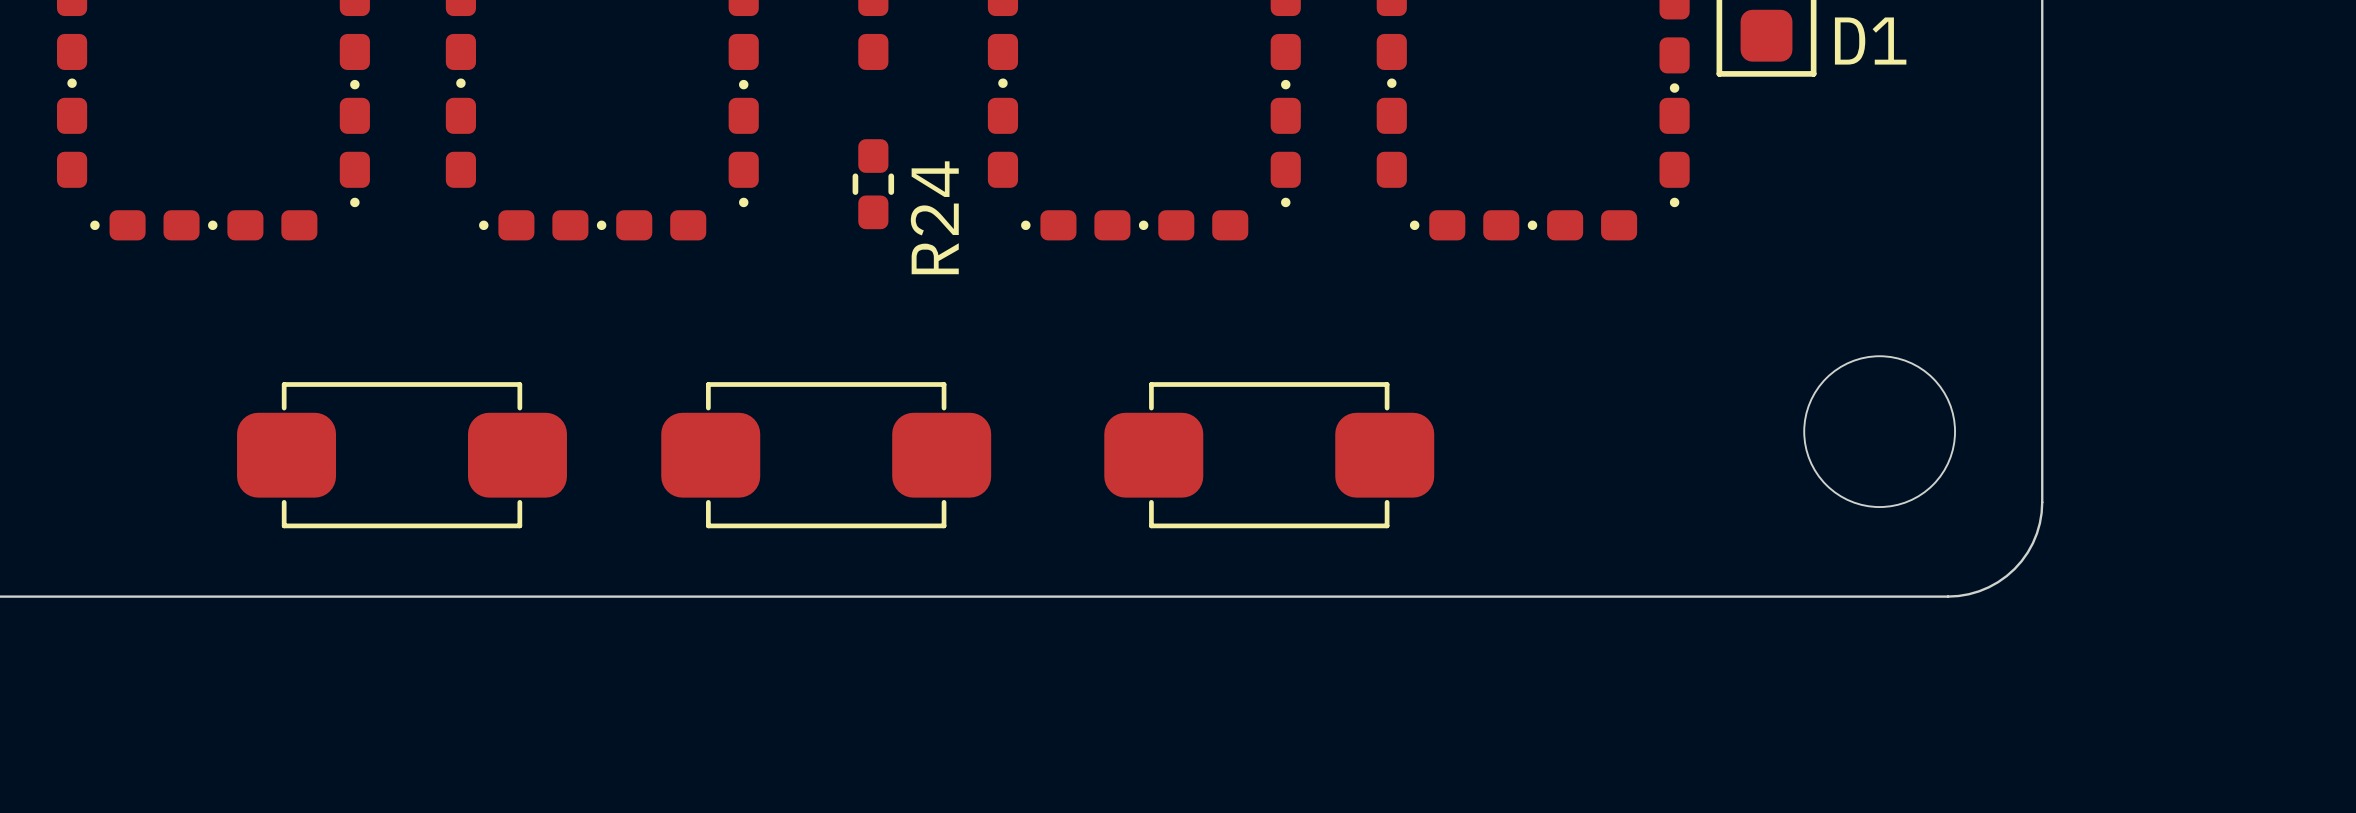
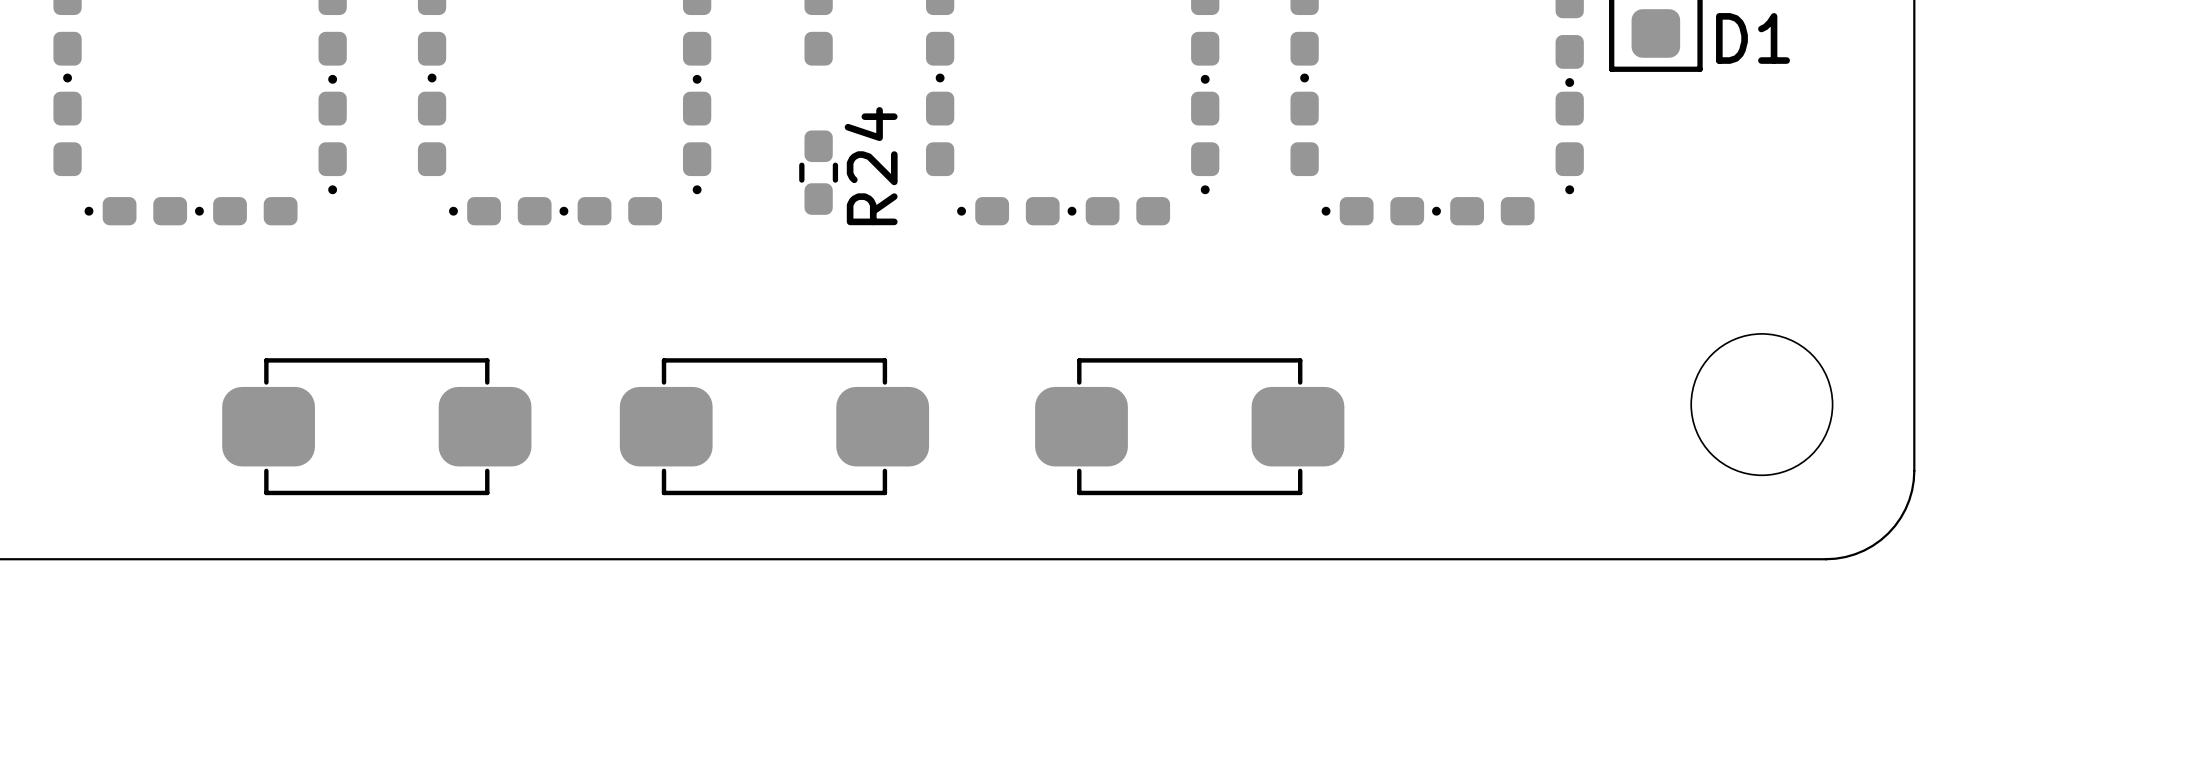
R24 name position: R24 (934, 217) -> R24 (871, 166)

